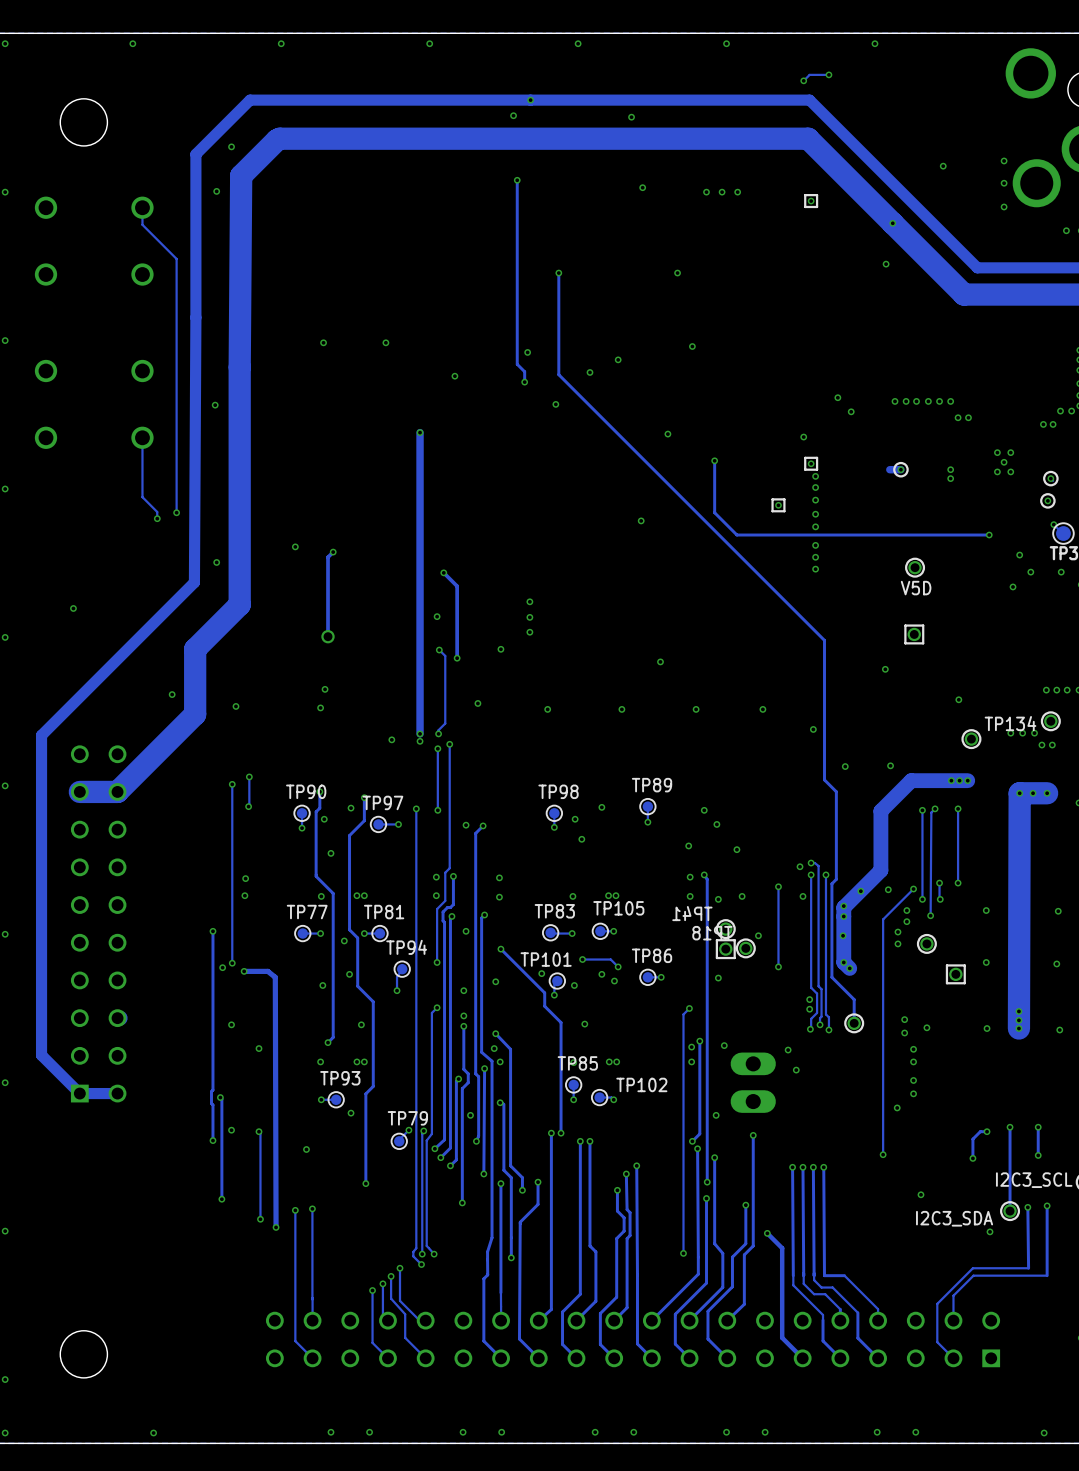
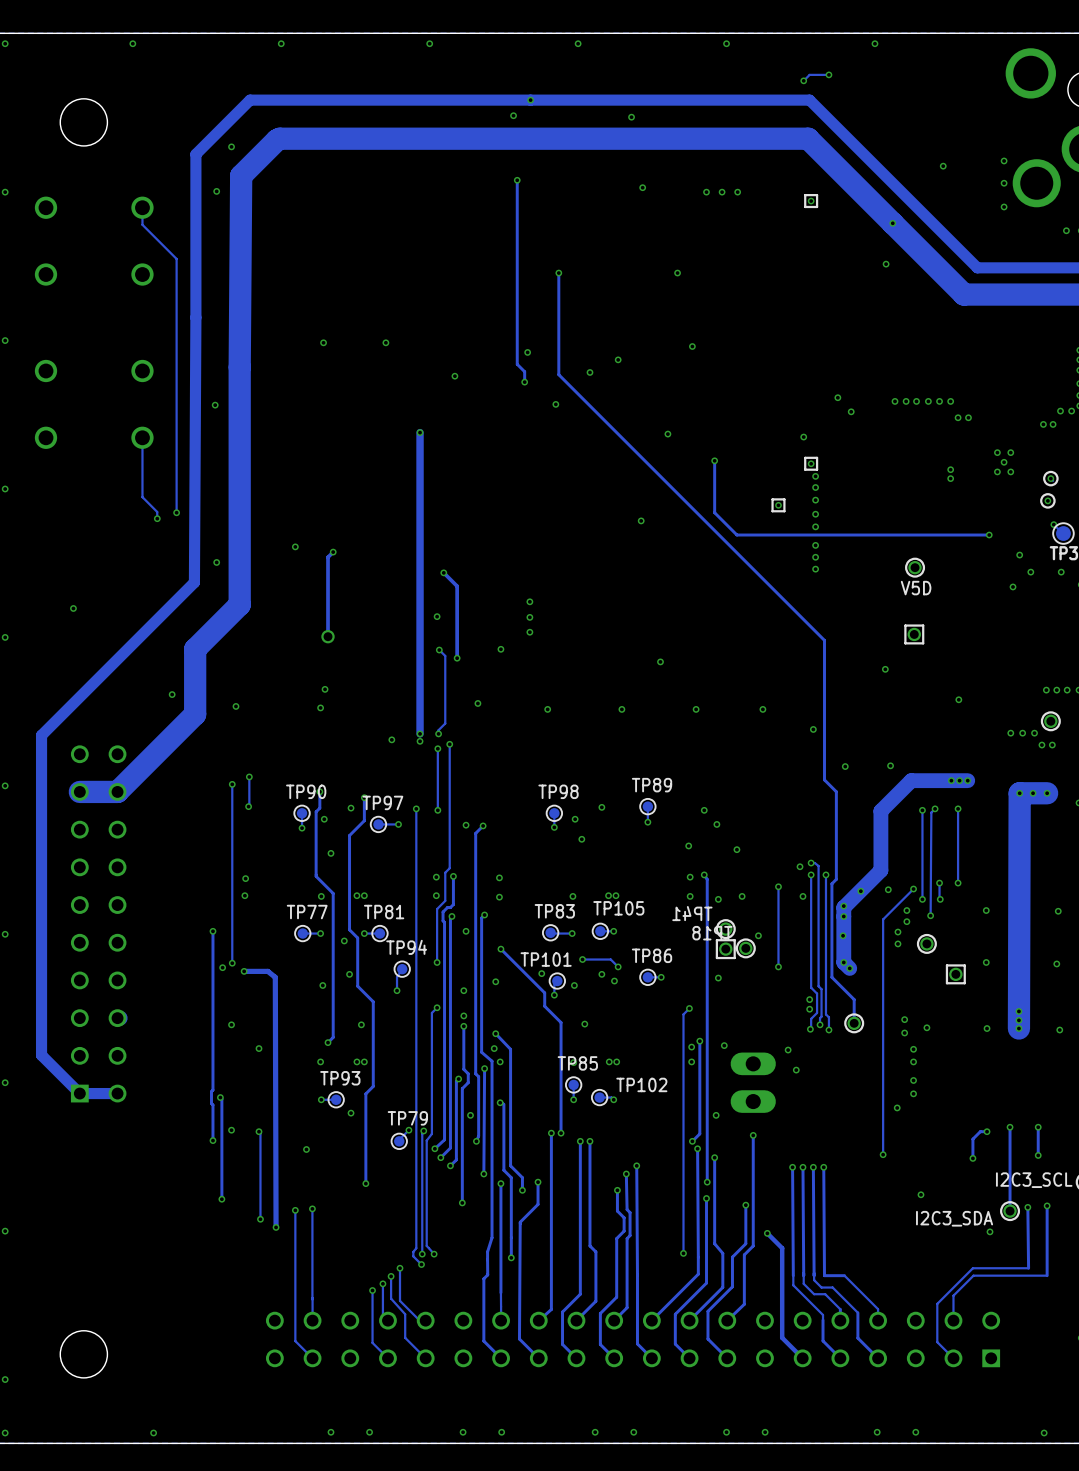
track: (900, 469) (889, 469) -> none
part: (900, 469) -> none
TP134: (971, 739) -> none

